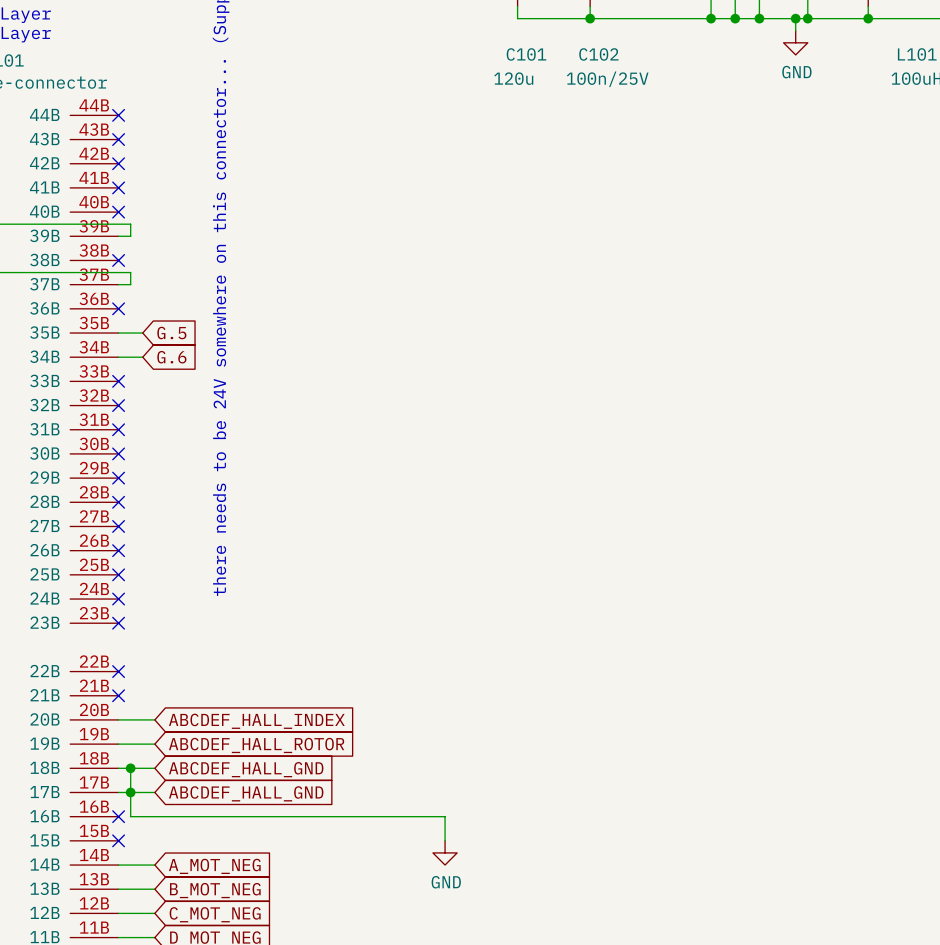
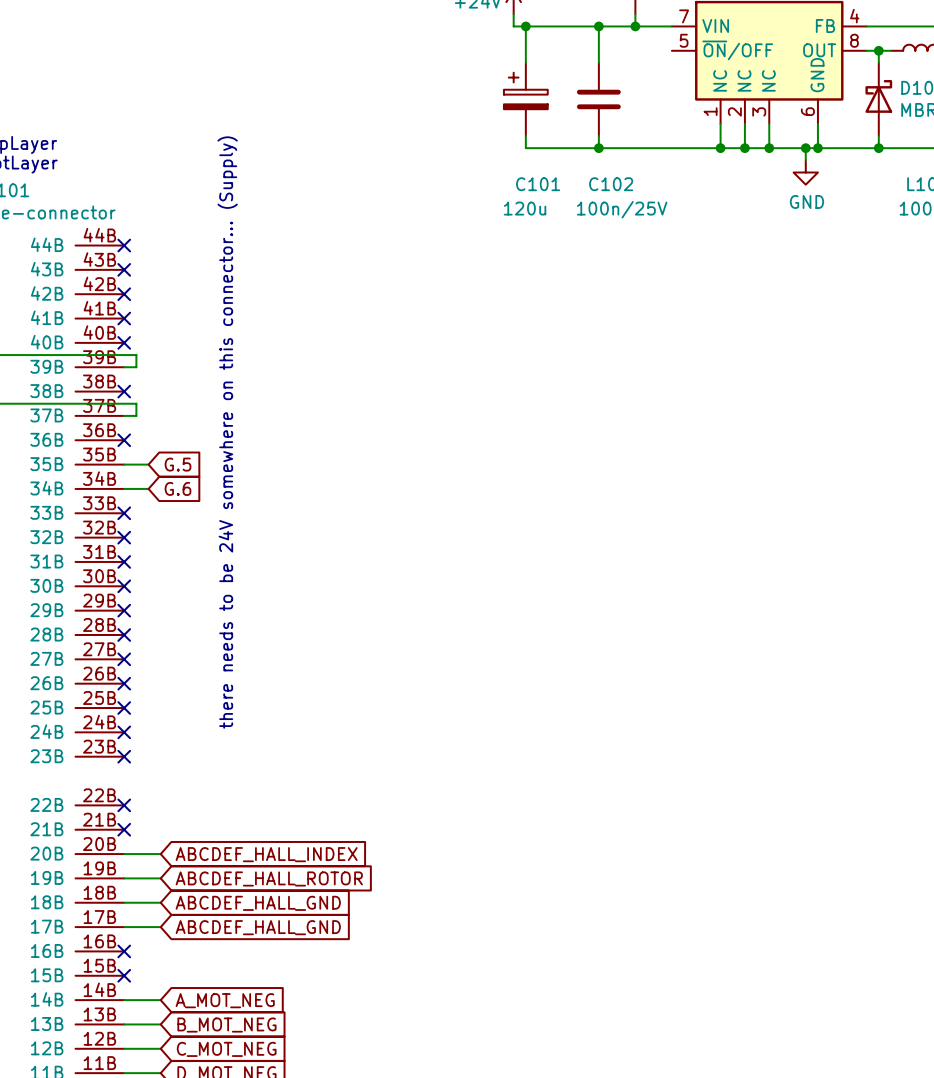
wire: (130, 768) (130, 816) (445, 816) (445, 840) -> none
junction: (130, 768) -> none
junction: (130, 792) -> none
power symbol: GND (445, 852) -> none

